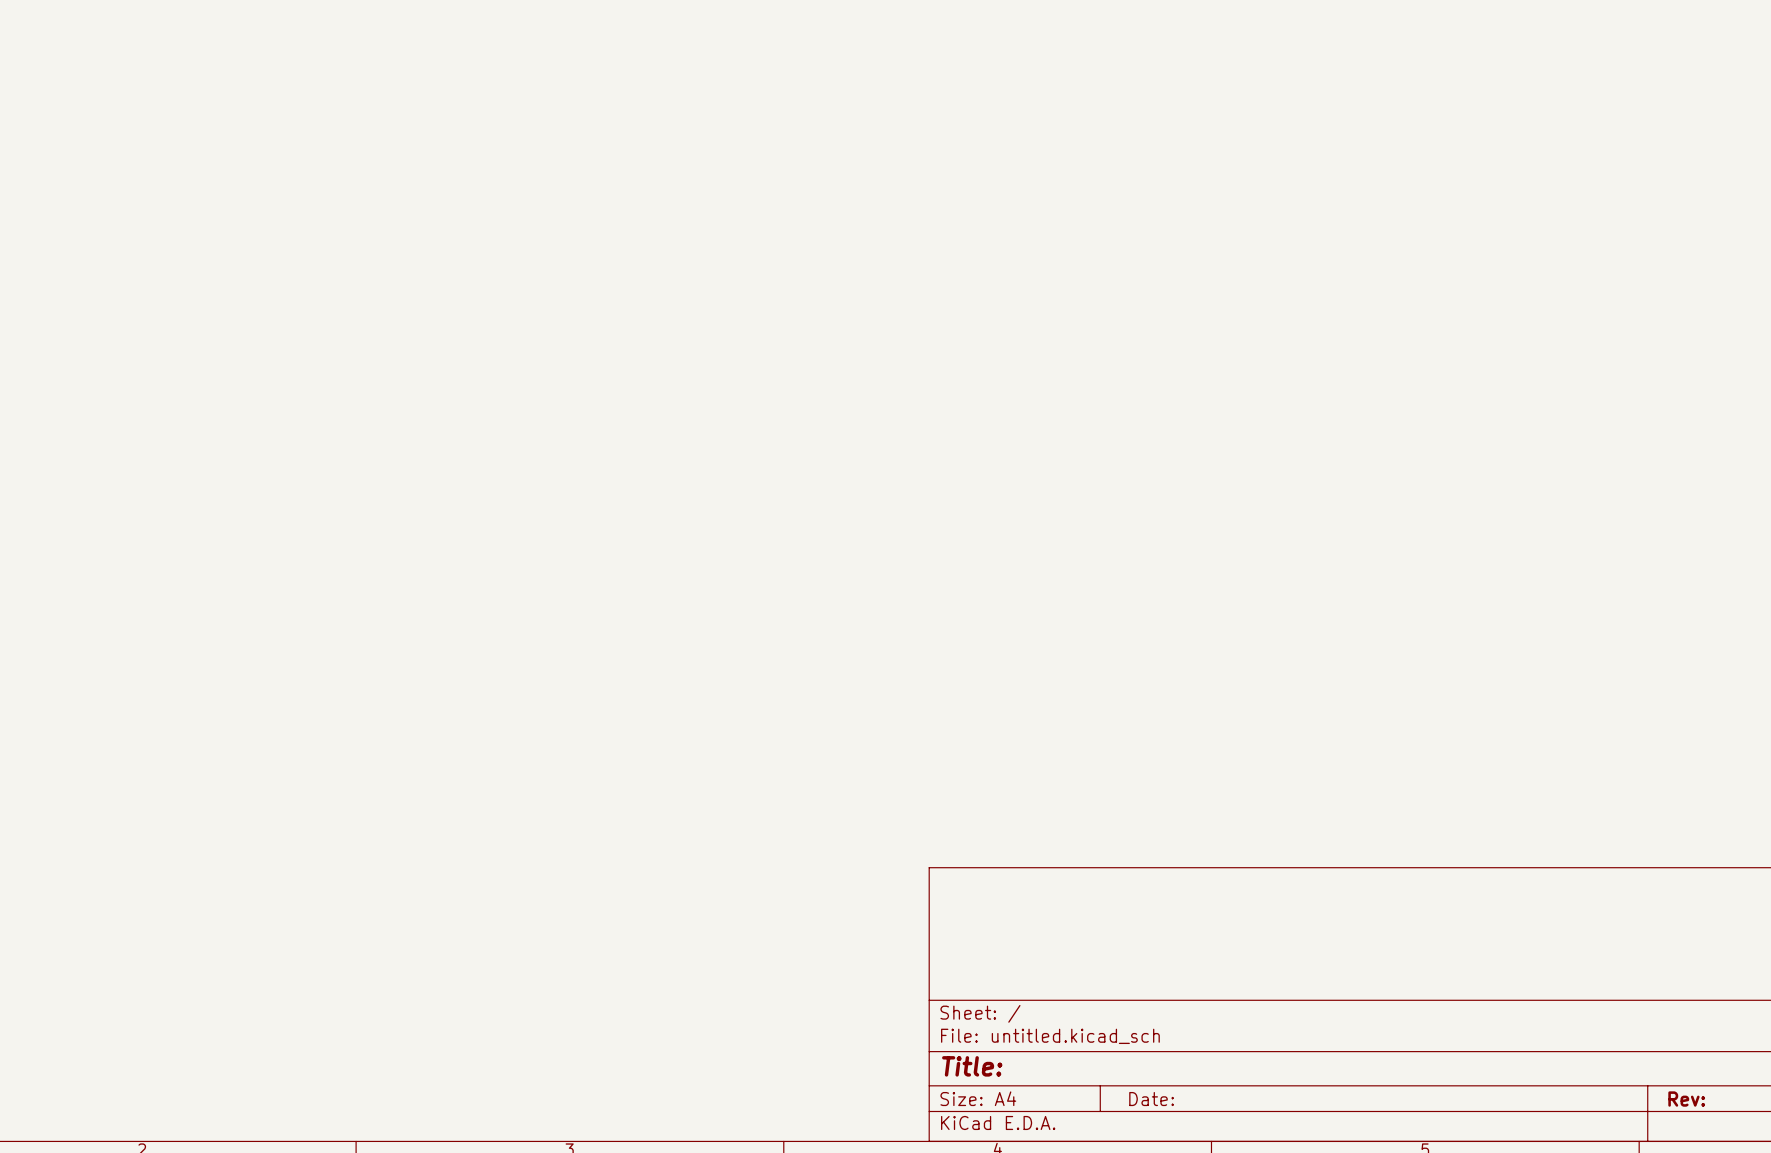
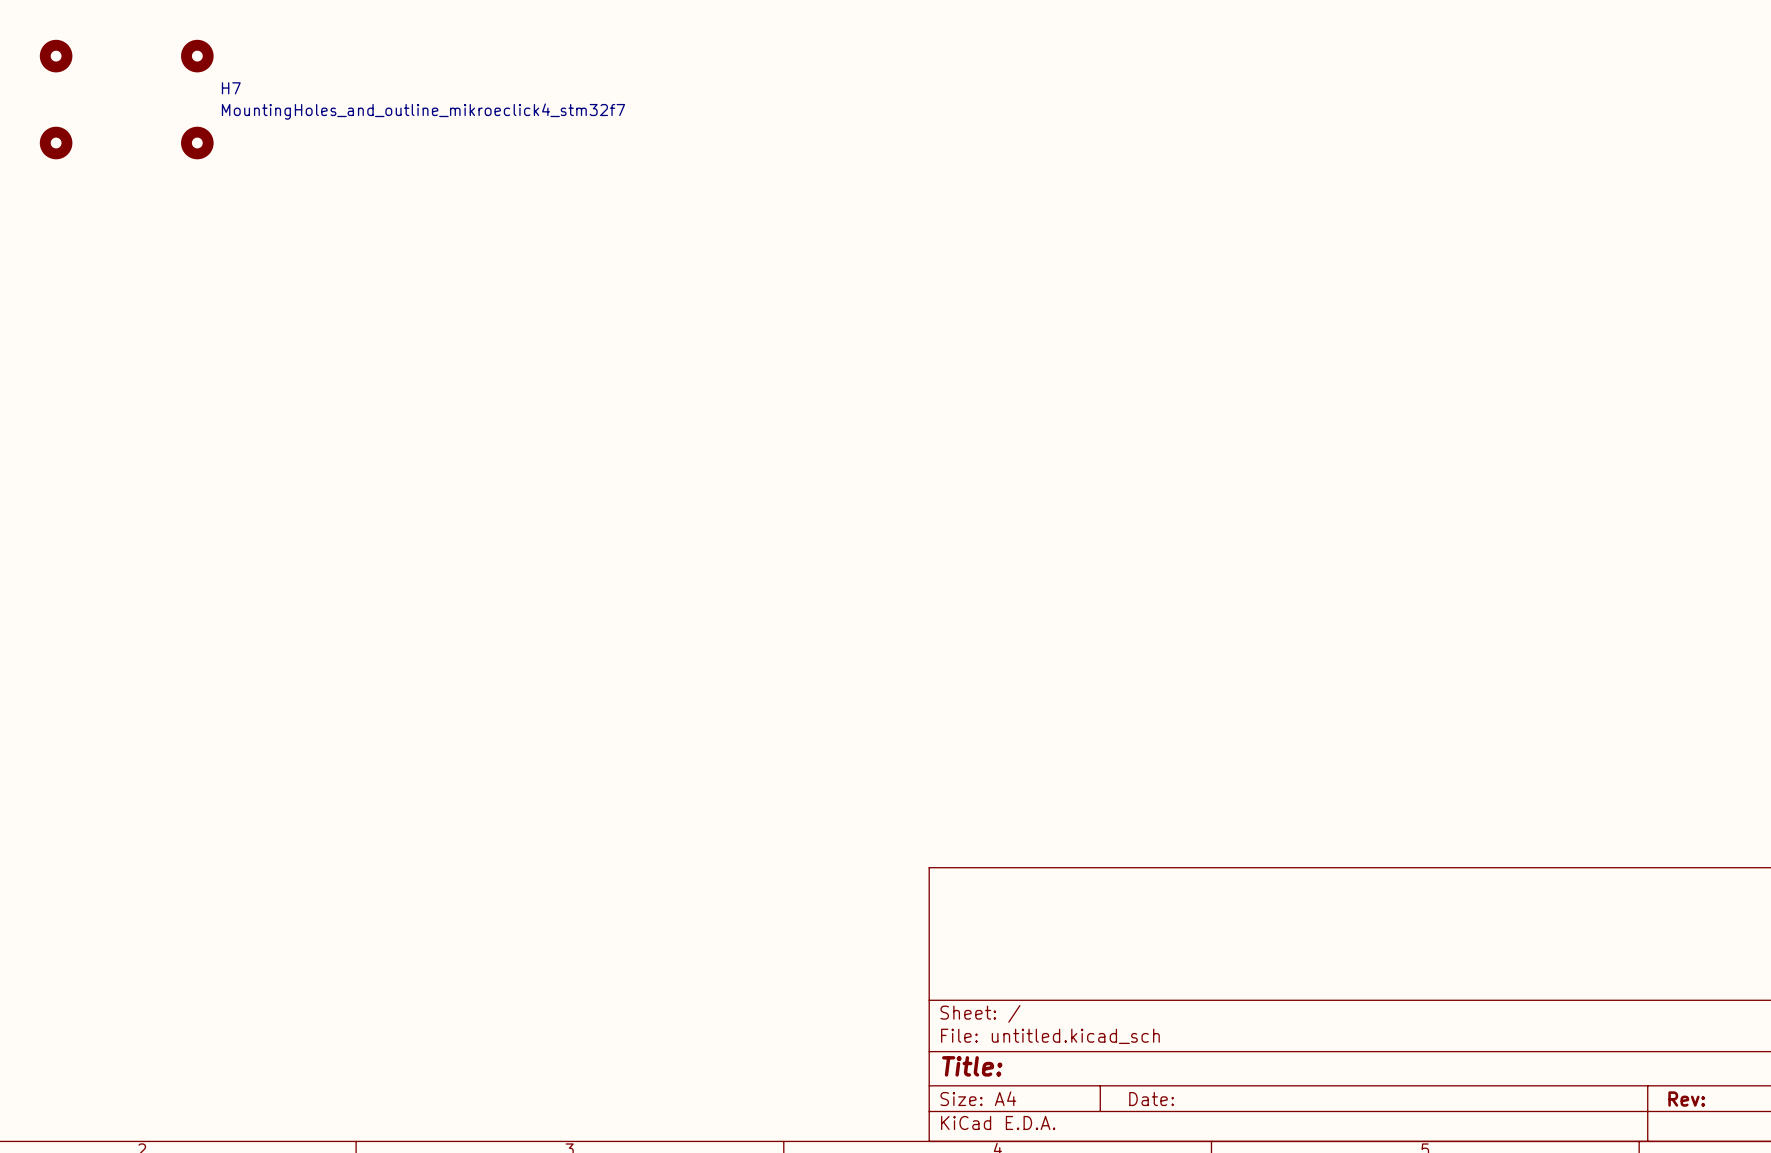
H7: none -> MountingHoles_and_outline_mikroeclick4_stm32f7 (126, 99)

